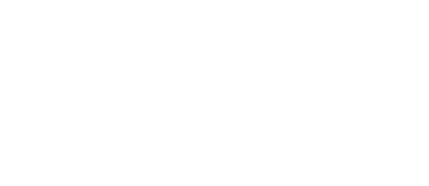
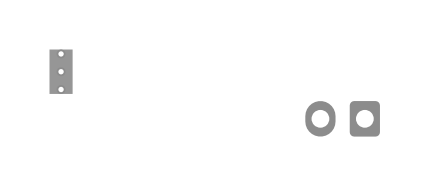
part: none -> (61, 71)
part: none -> (342, 118)

